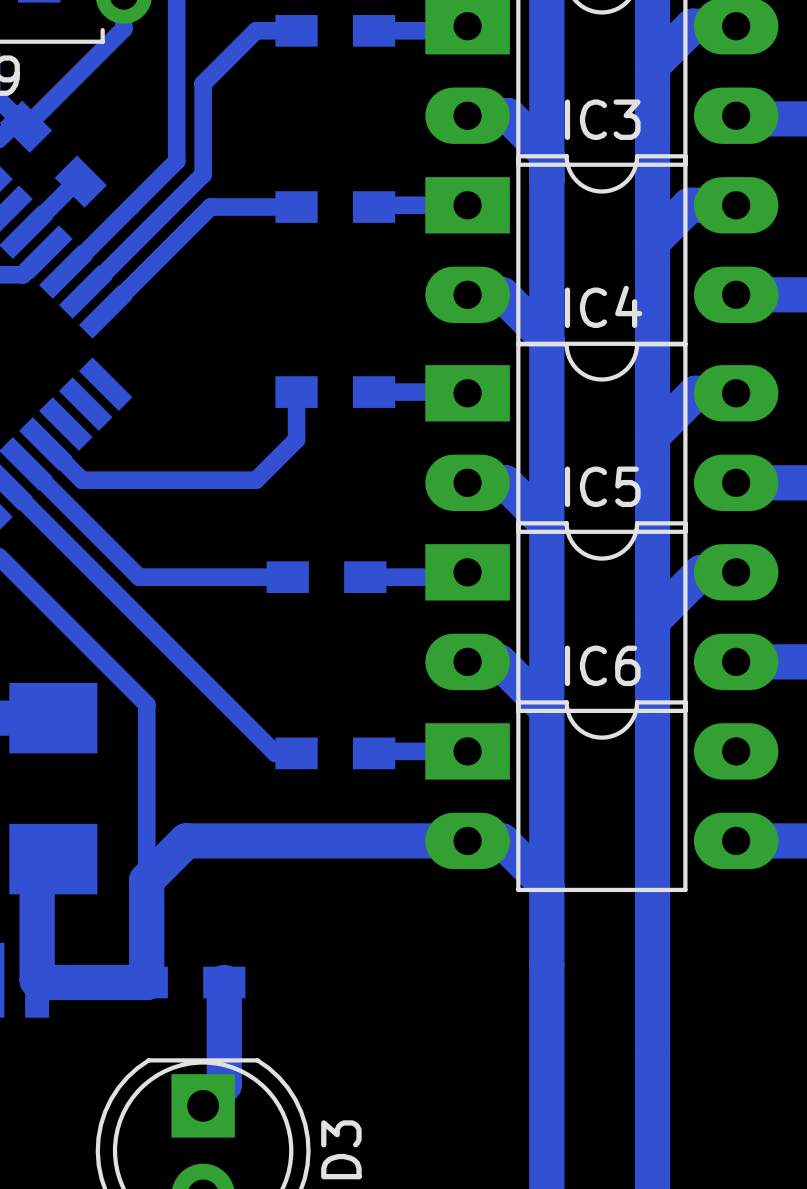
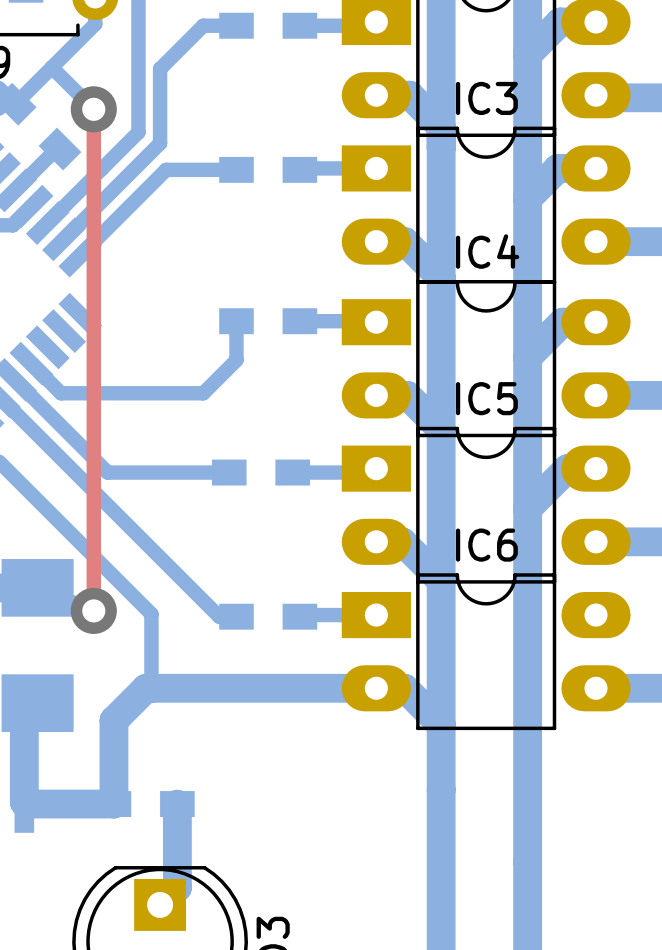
bottom track: none -> (51, 67) (93, 109)
top track: none -> (93, 109) (93, 610)
via: none -> (93, 109)
bottom track: (146, 704) (146, 880) -> (113, 576) (151, 614) (151, 688)
via: none -> (93, 610)

